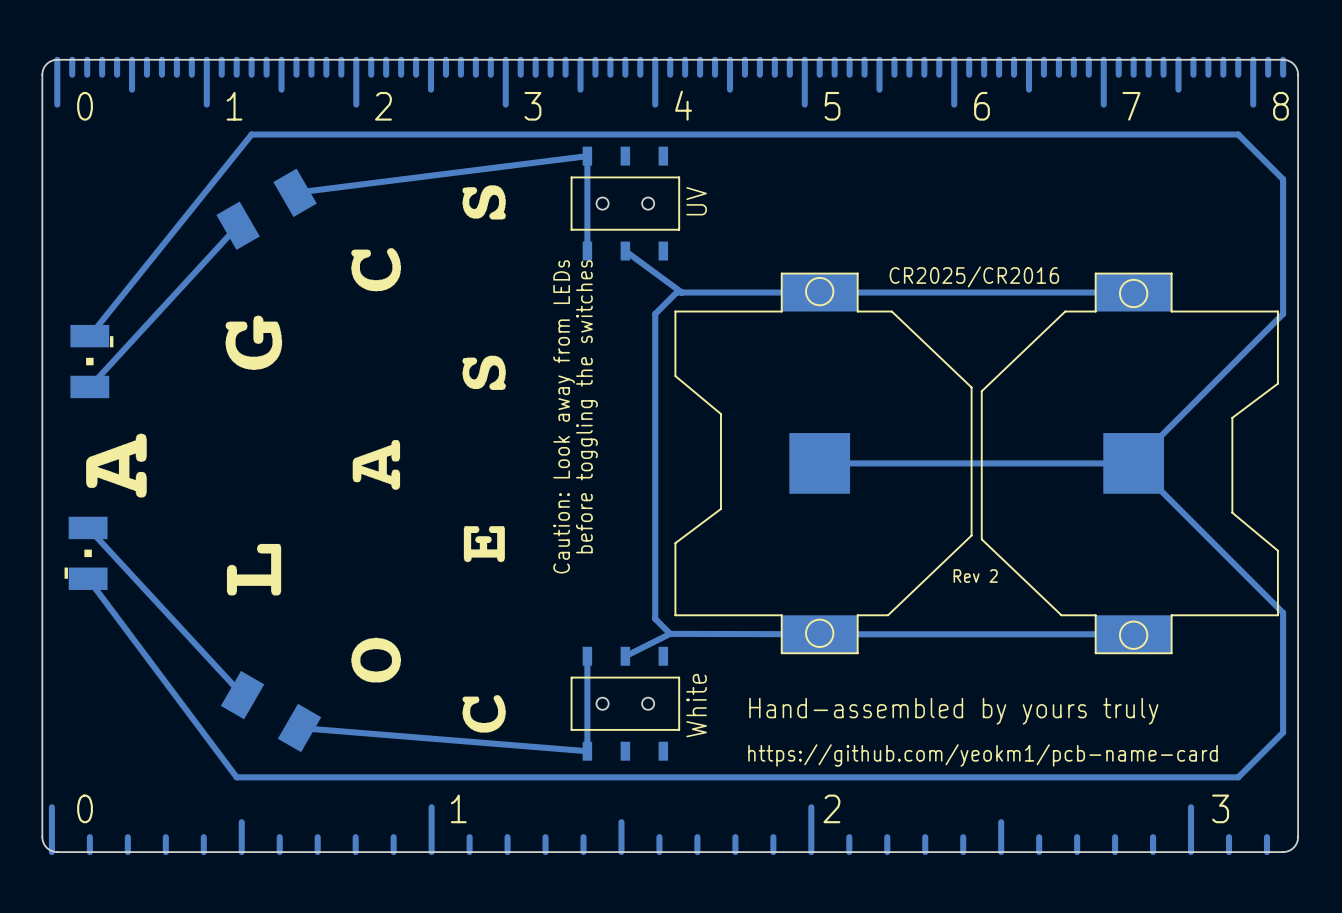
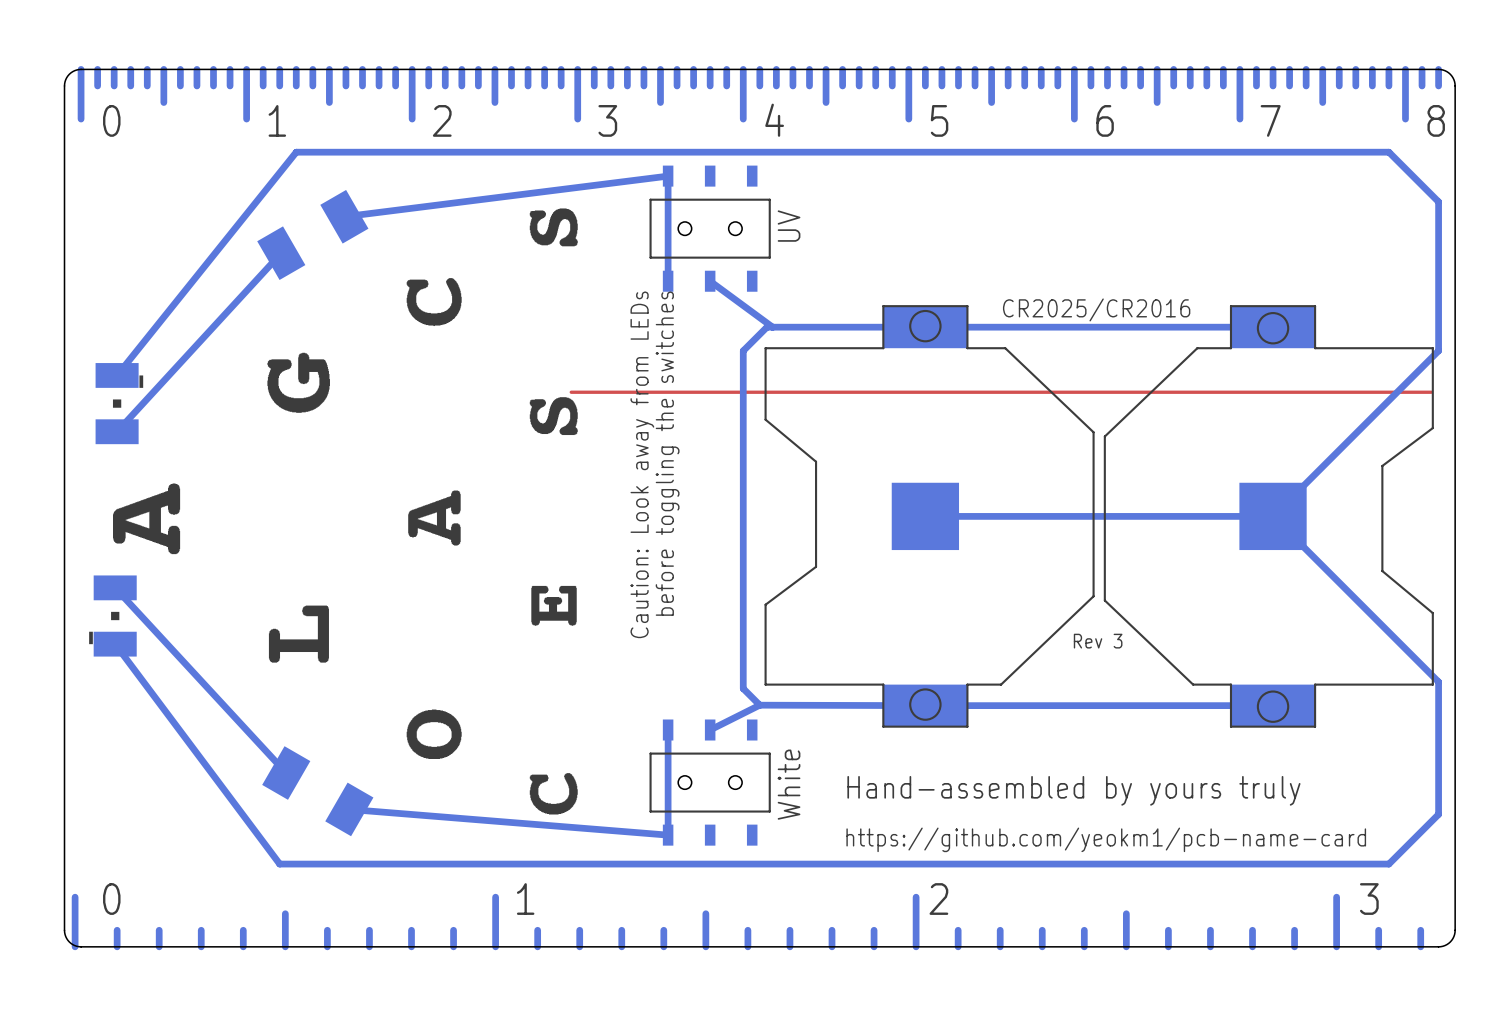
top track: none -> (1431, 392) (571, 392)
text: Rev 2 (975, 576) -> Rev 3 (1098, 641)

